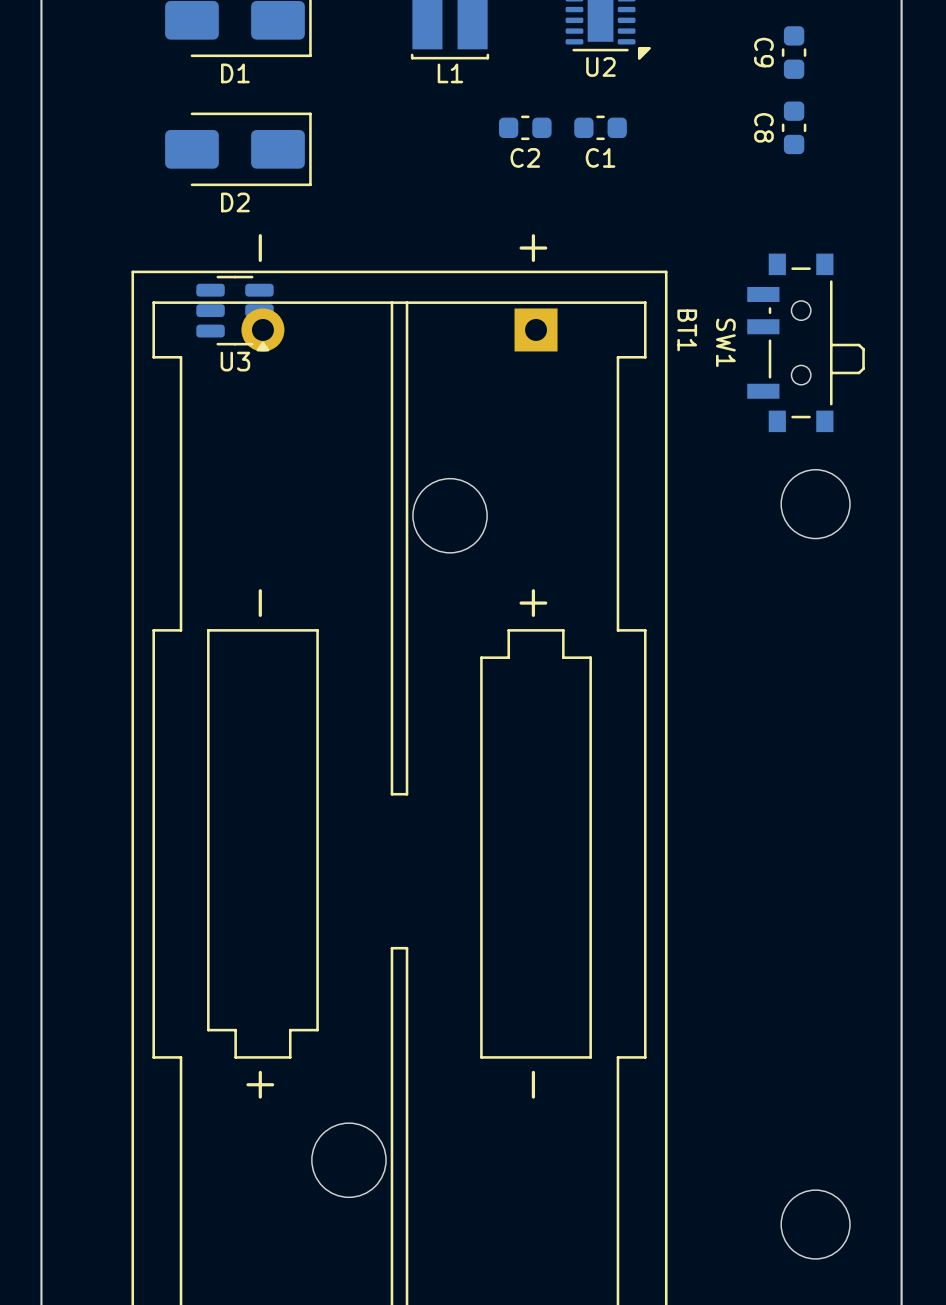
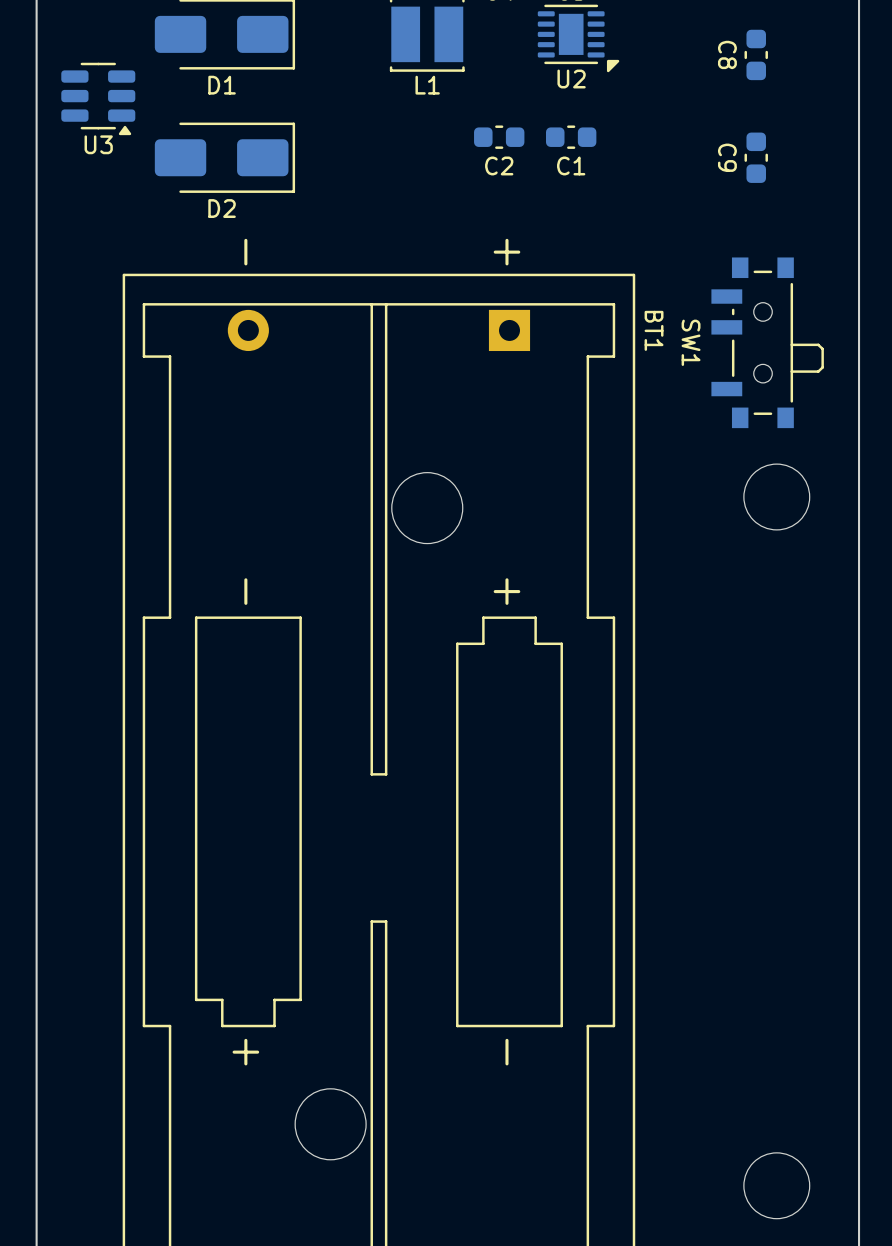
C9 position: (794, 52) -> (756, 157)
C8 position: (794, 127) -> (756, 54)
U3 position: (234, 313) -> (98, 98)

